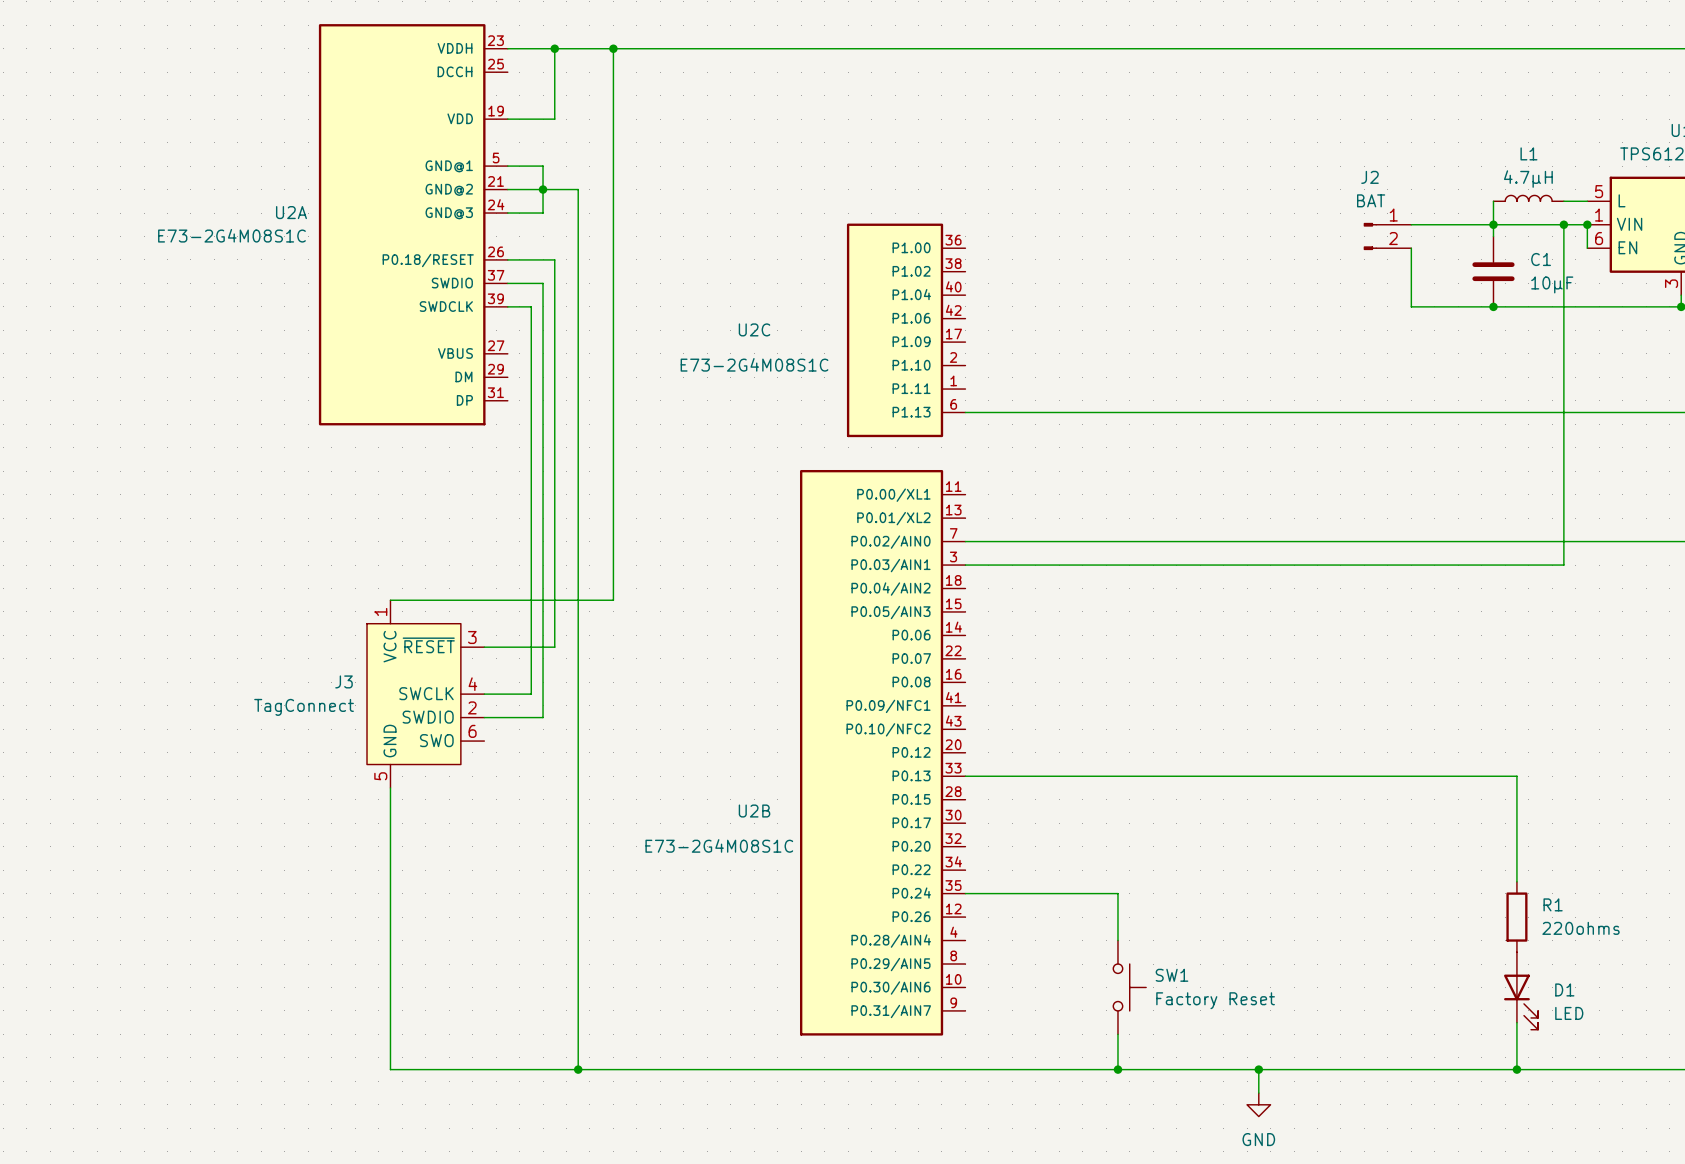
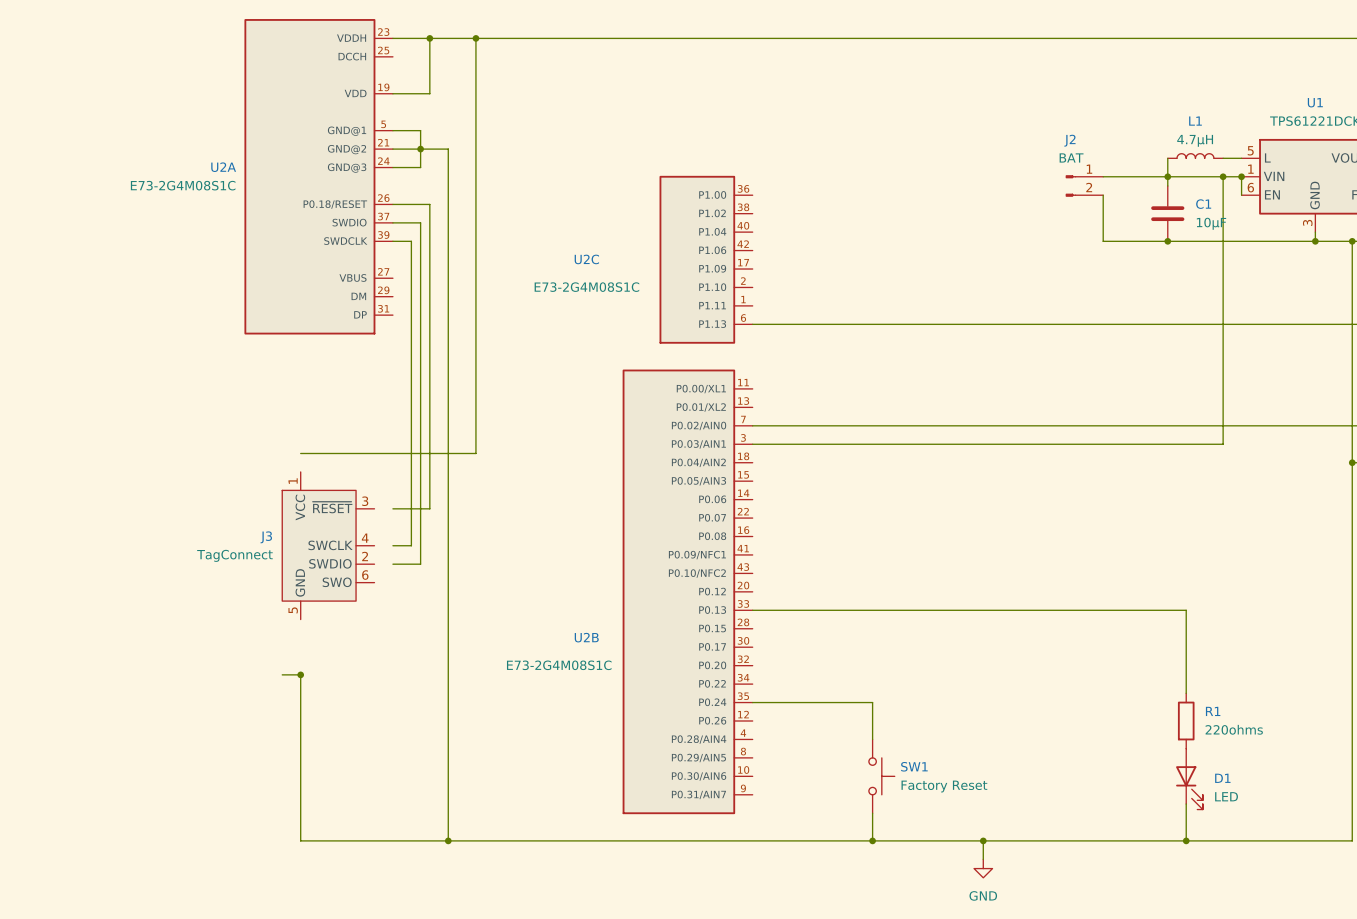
wire: (613, 576) (613, 600) (390, 600) -> (475, 453) (300, 453)
wire: (484, 647) (507, 647) -> none
wire: (484, 694) (507, 694) -> none
wire: (484, 717) (507, 717) -> none
wire: (390, 787) (390, 858) -> (282, 674) (300, 674)
junction: none -> (300, 674)

